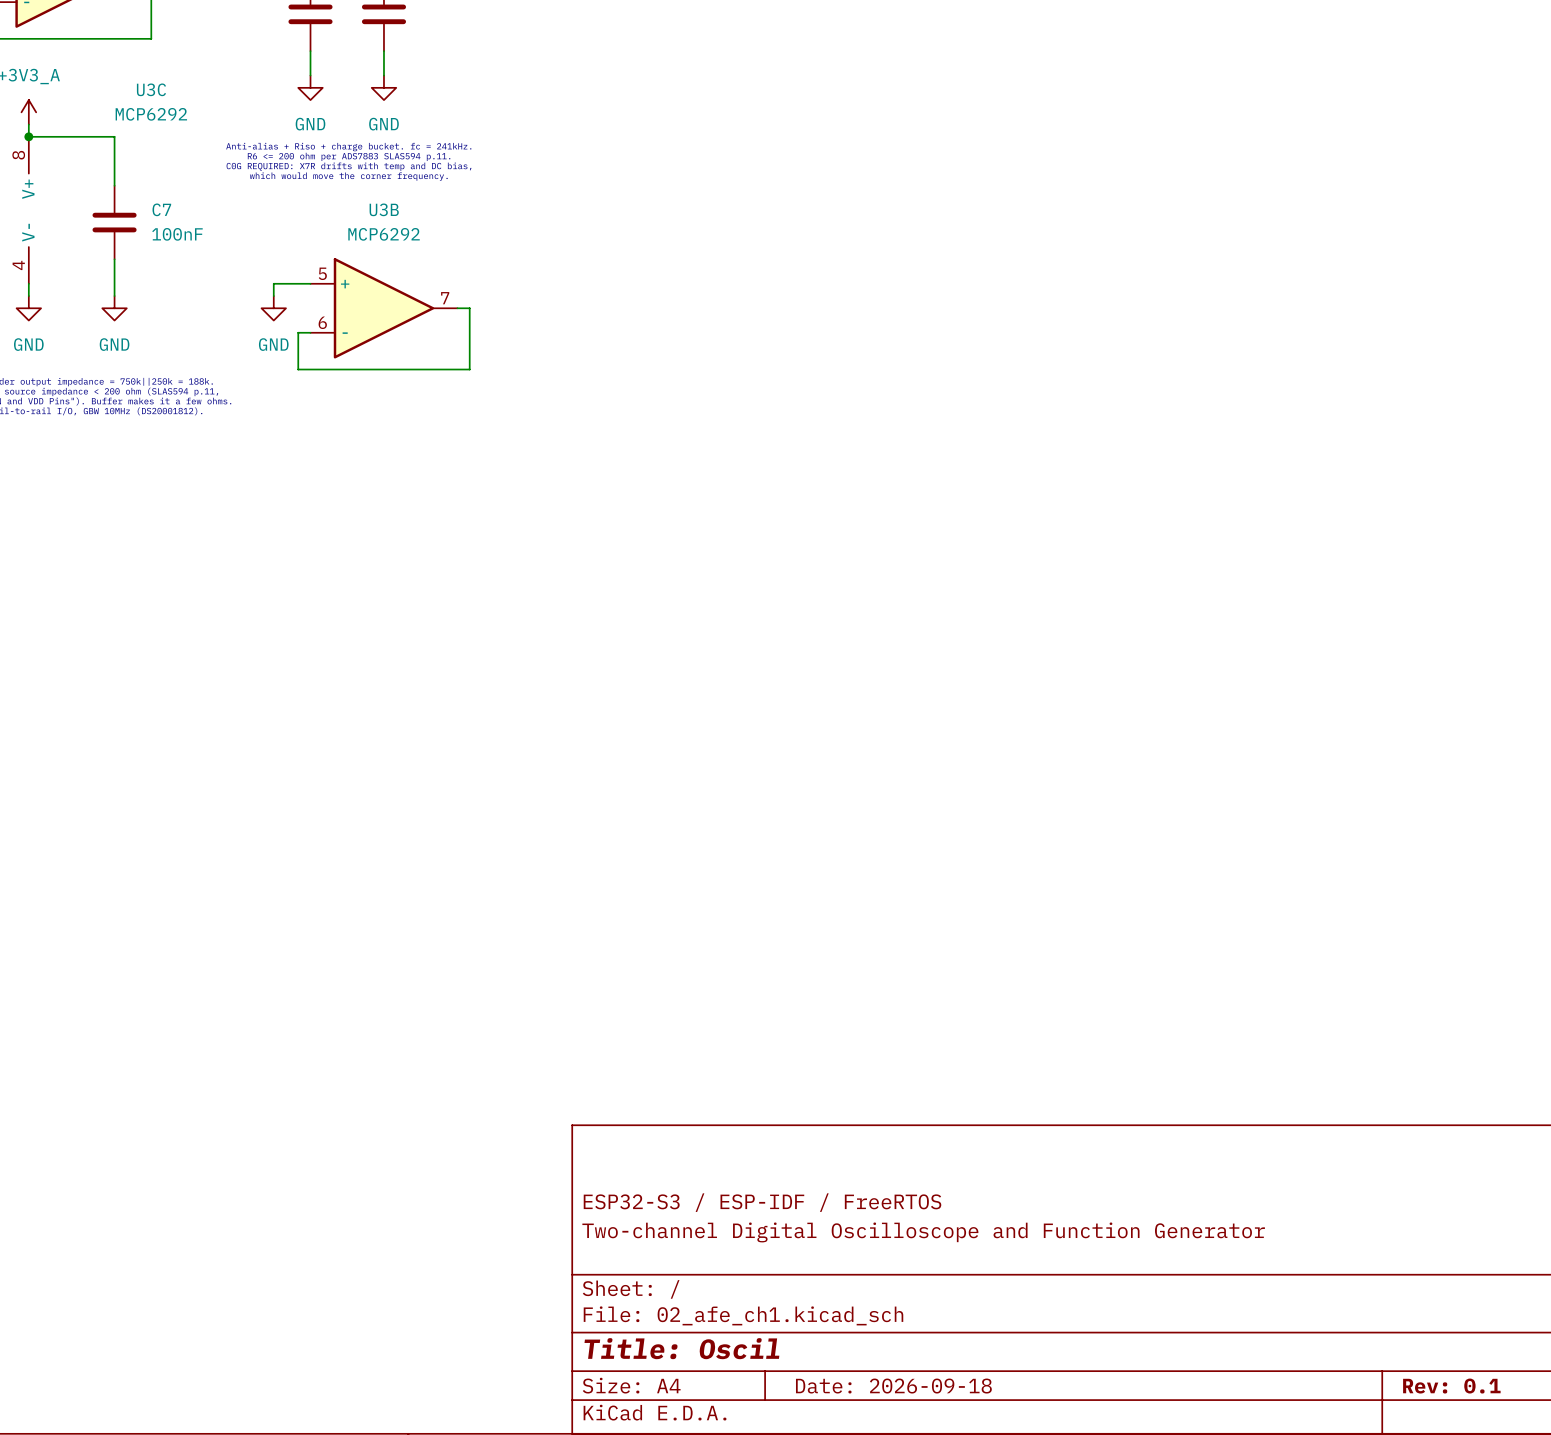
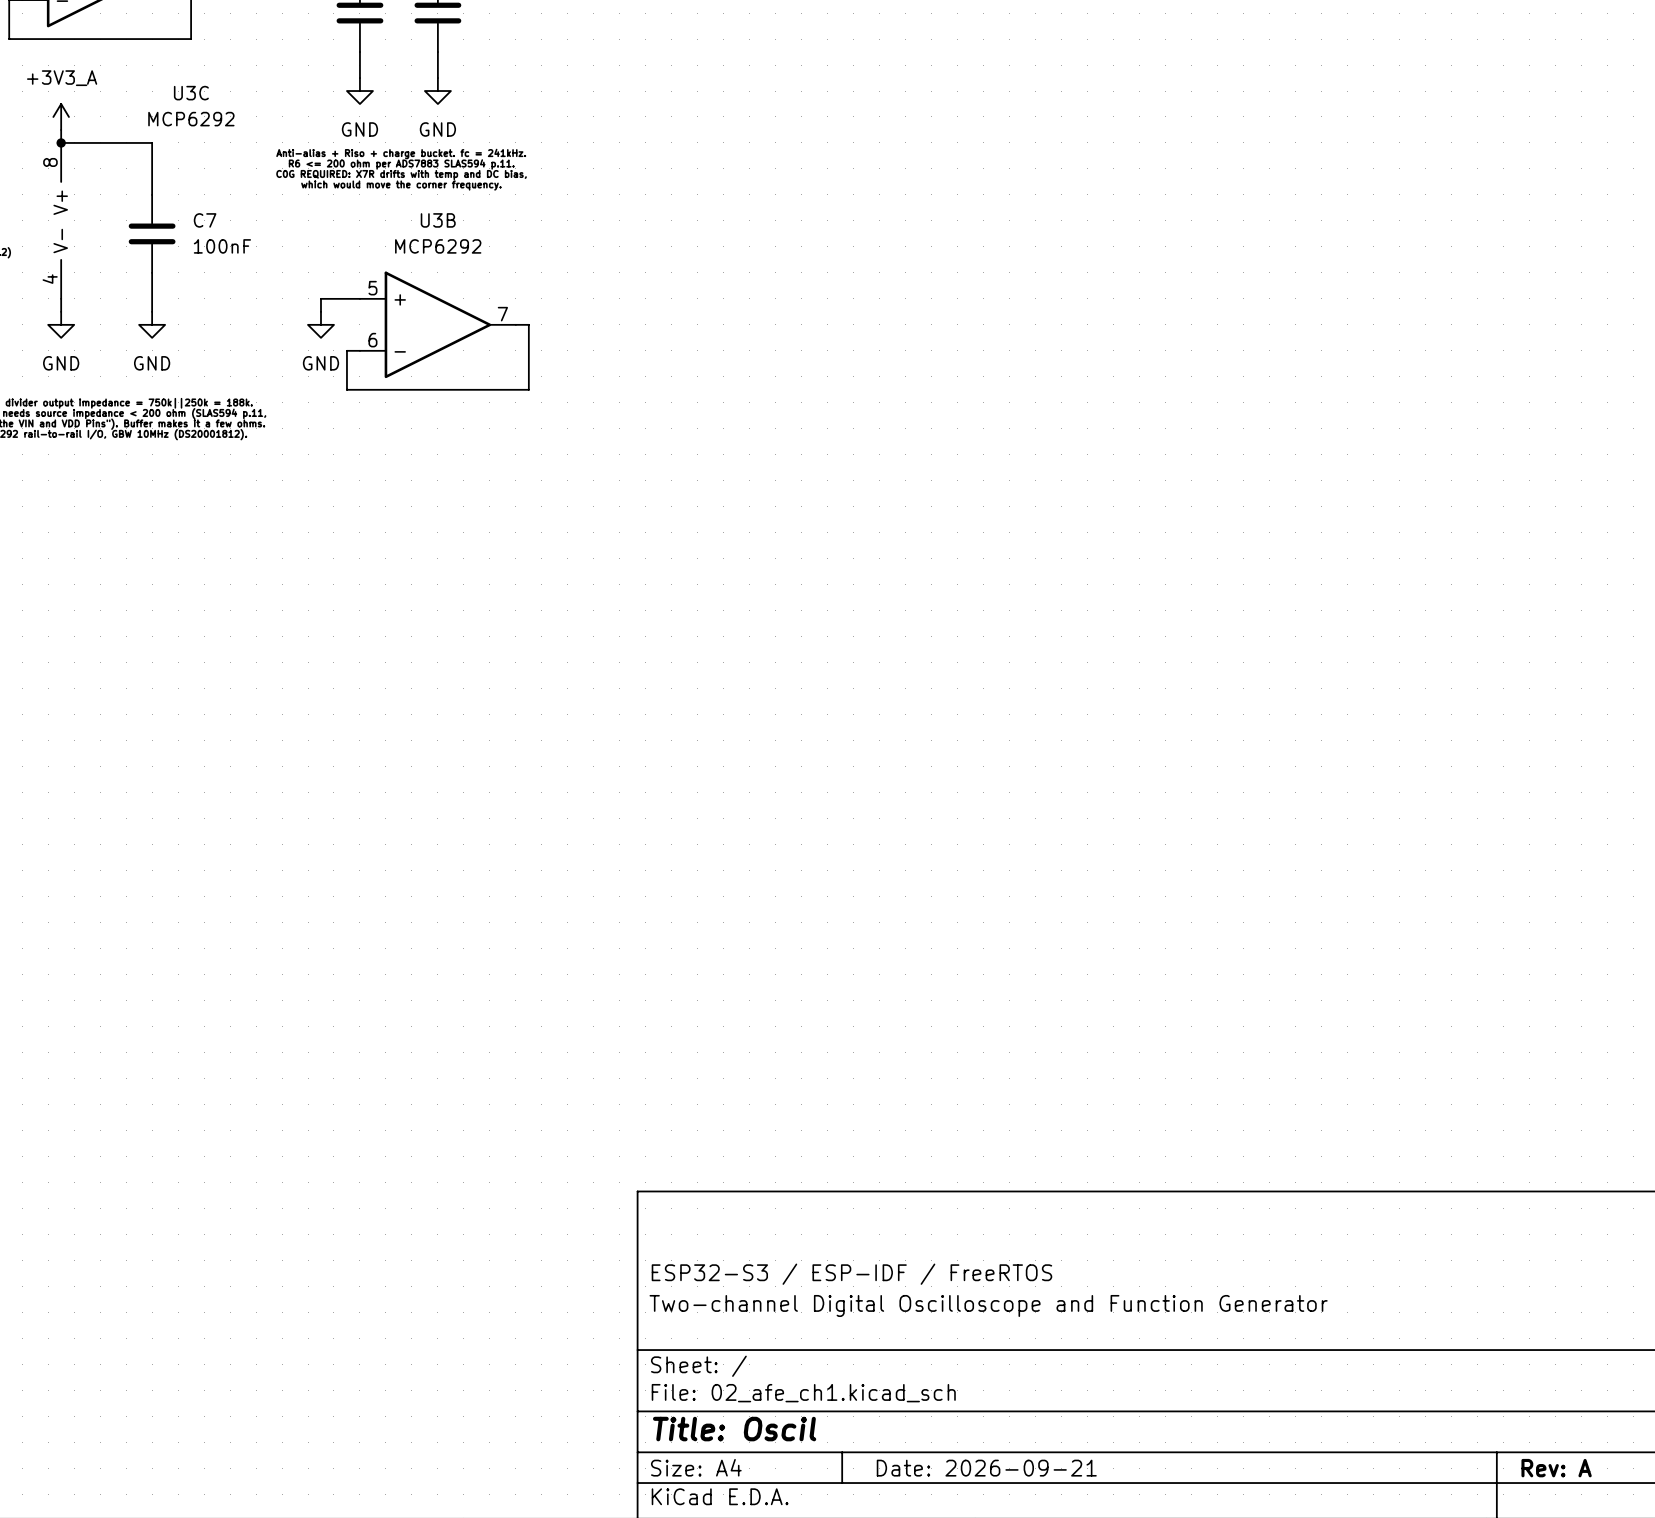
title block: Date: 2026-09-18 (893, 1386) -> Date: 2026-09-21 (986, 1468)
title block: Rev: 0.1 (1451, 1386) -> Rev: A (1556, 1468)

